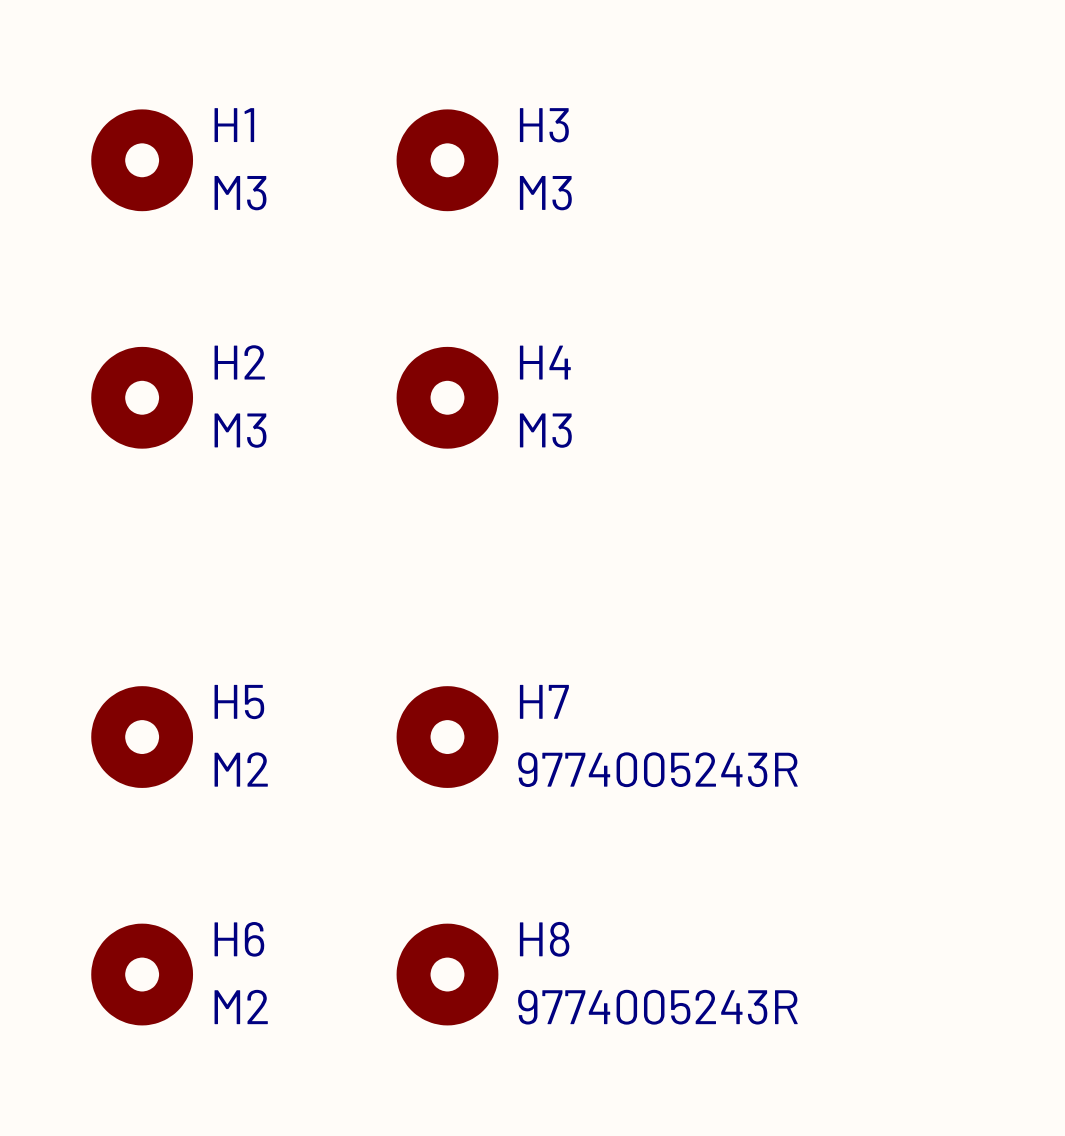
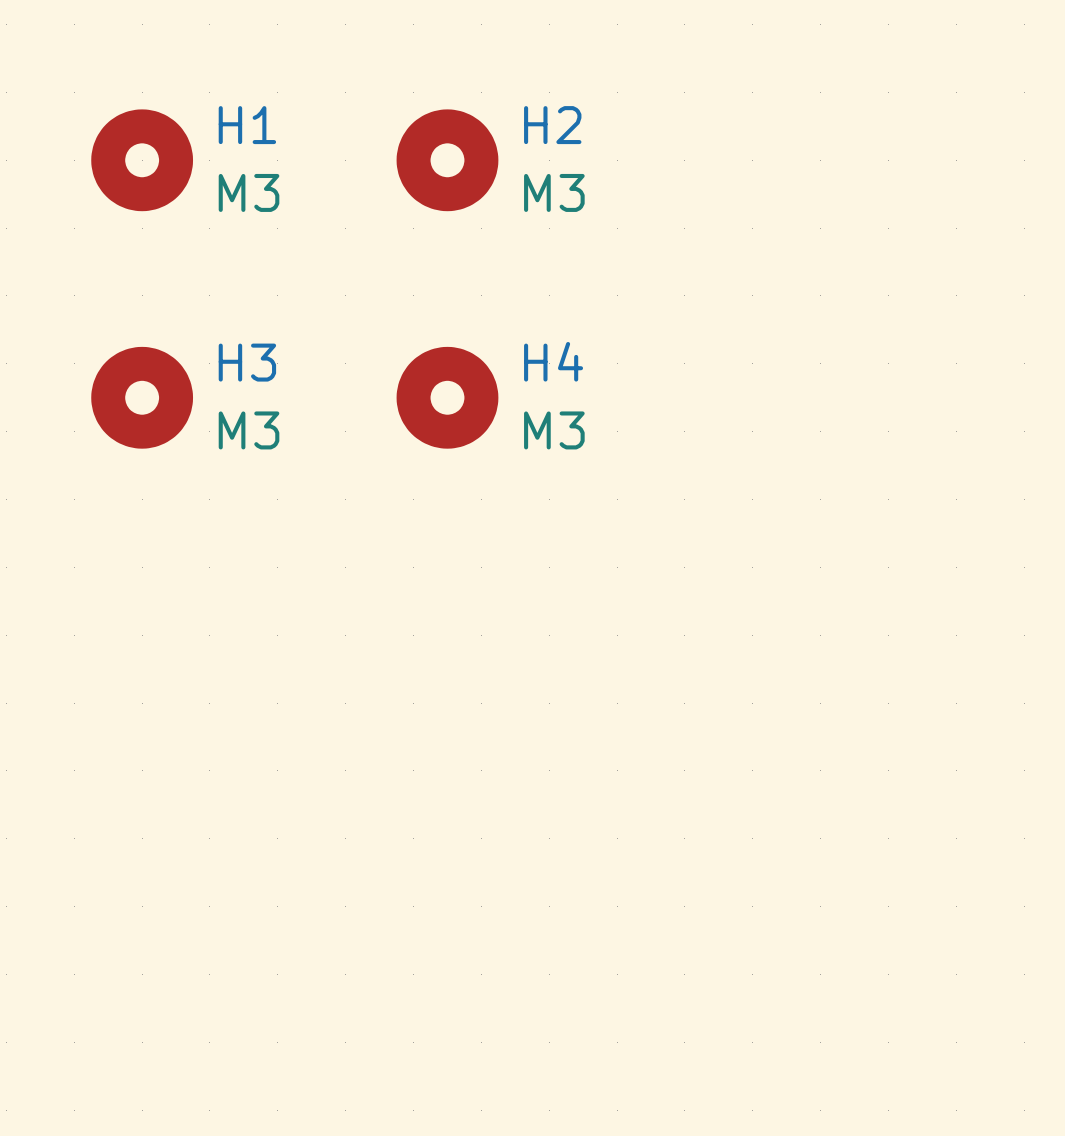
H3 name: H3 (544, 125) -> H2 (552, 125)
H2 name: H2 (239, 362) -> H3 (247, 362)
H5: M2 (142, 737) -> none
H7: 9774005243R (447, 737) -> none
H6: M2 (142, 974) -> none
H8: 9774005243R (447, 974) -> none

